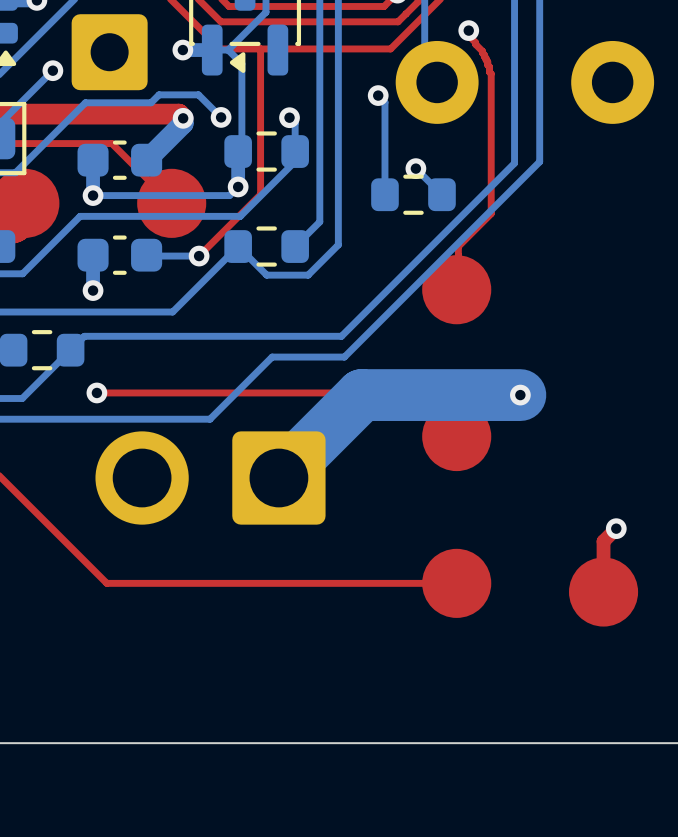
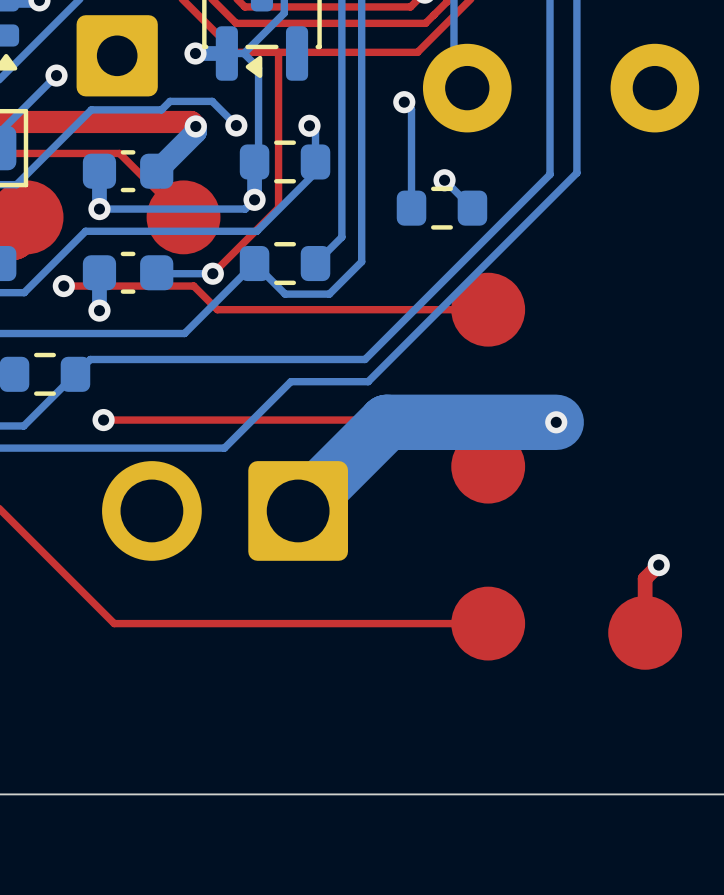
top track: (468, 30) (468, 35) (482, 51) (491, 73) (491, 213) (458, 246) (456, 289) -> (63, 286) (193, 286) (217, 309) (488, 309)
via: (468, 30) -> none
via: none -> (63, 286)

